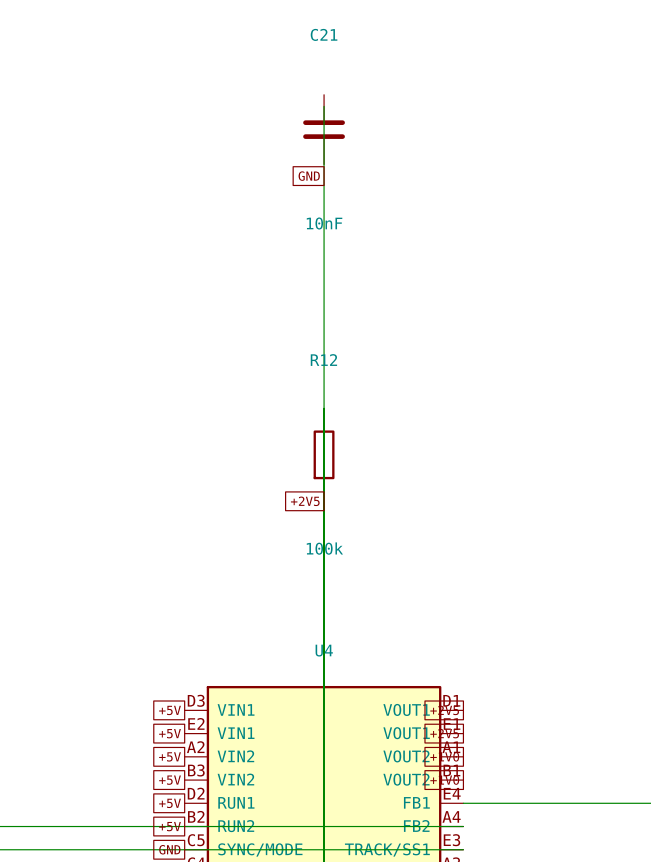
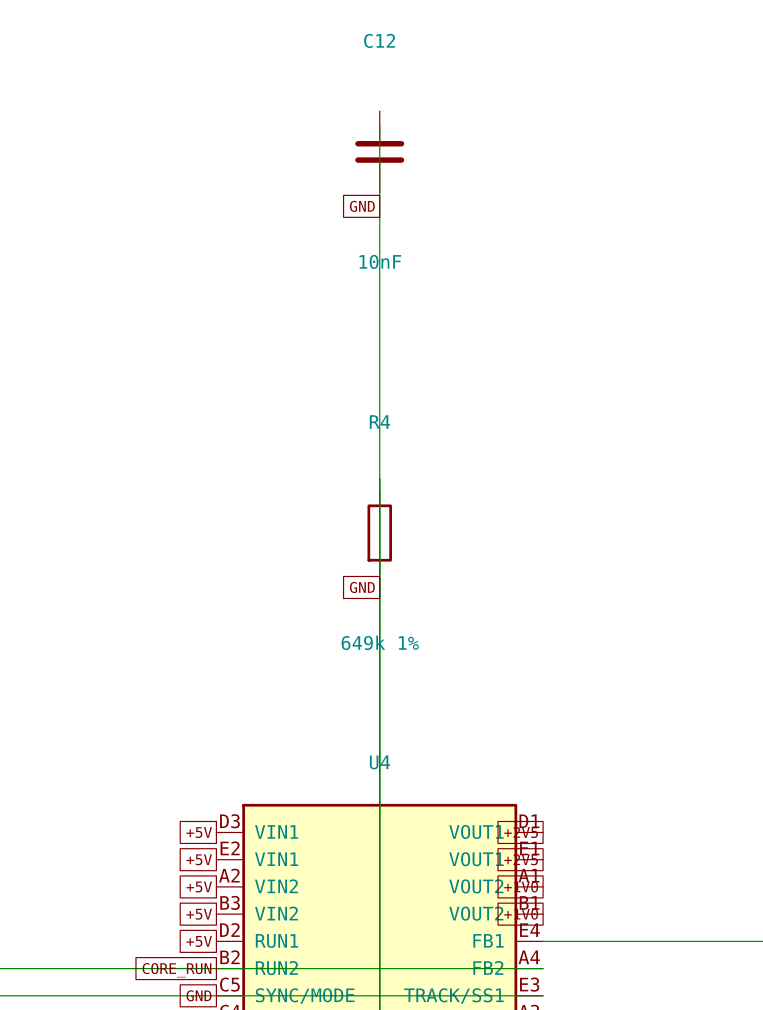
C21 name: C21 (324, 34) -> C12 (379, 40)
R12 name: R12 (323, 360) -> R4 (379, 422)
global label: +2V5 (305, 501) -> GND (362, 587)
R12 value: 100k (324, 548) -> 649k 1% (380, 642)
global label: +5V (170, 826) -> CORE_RUN (176, 970)

